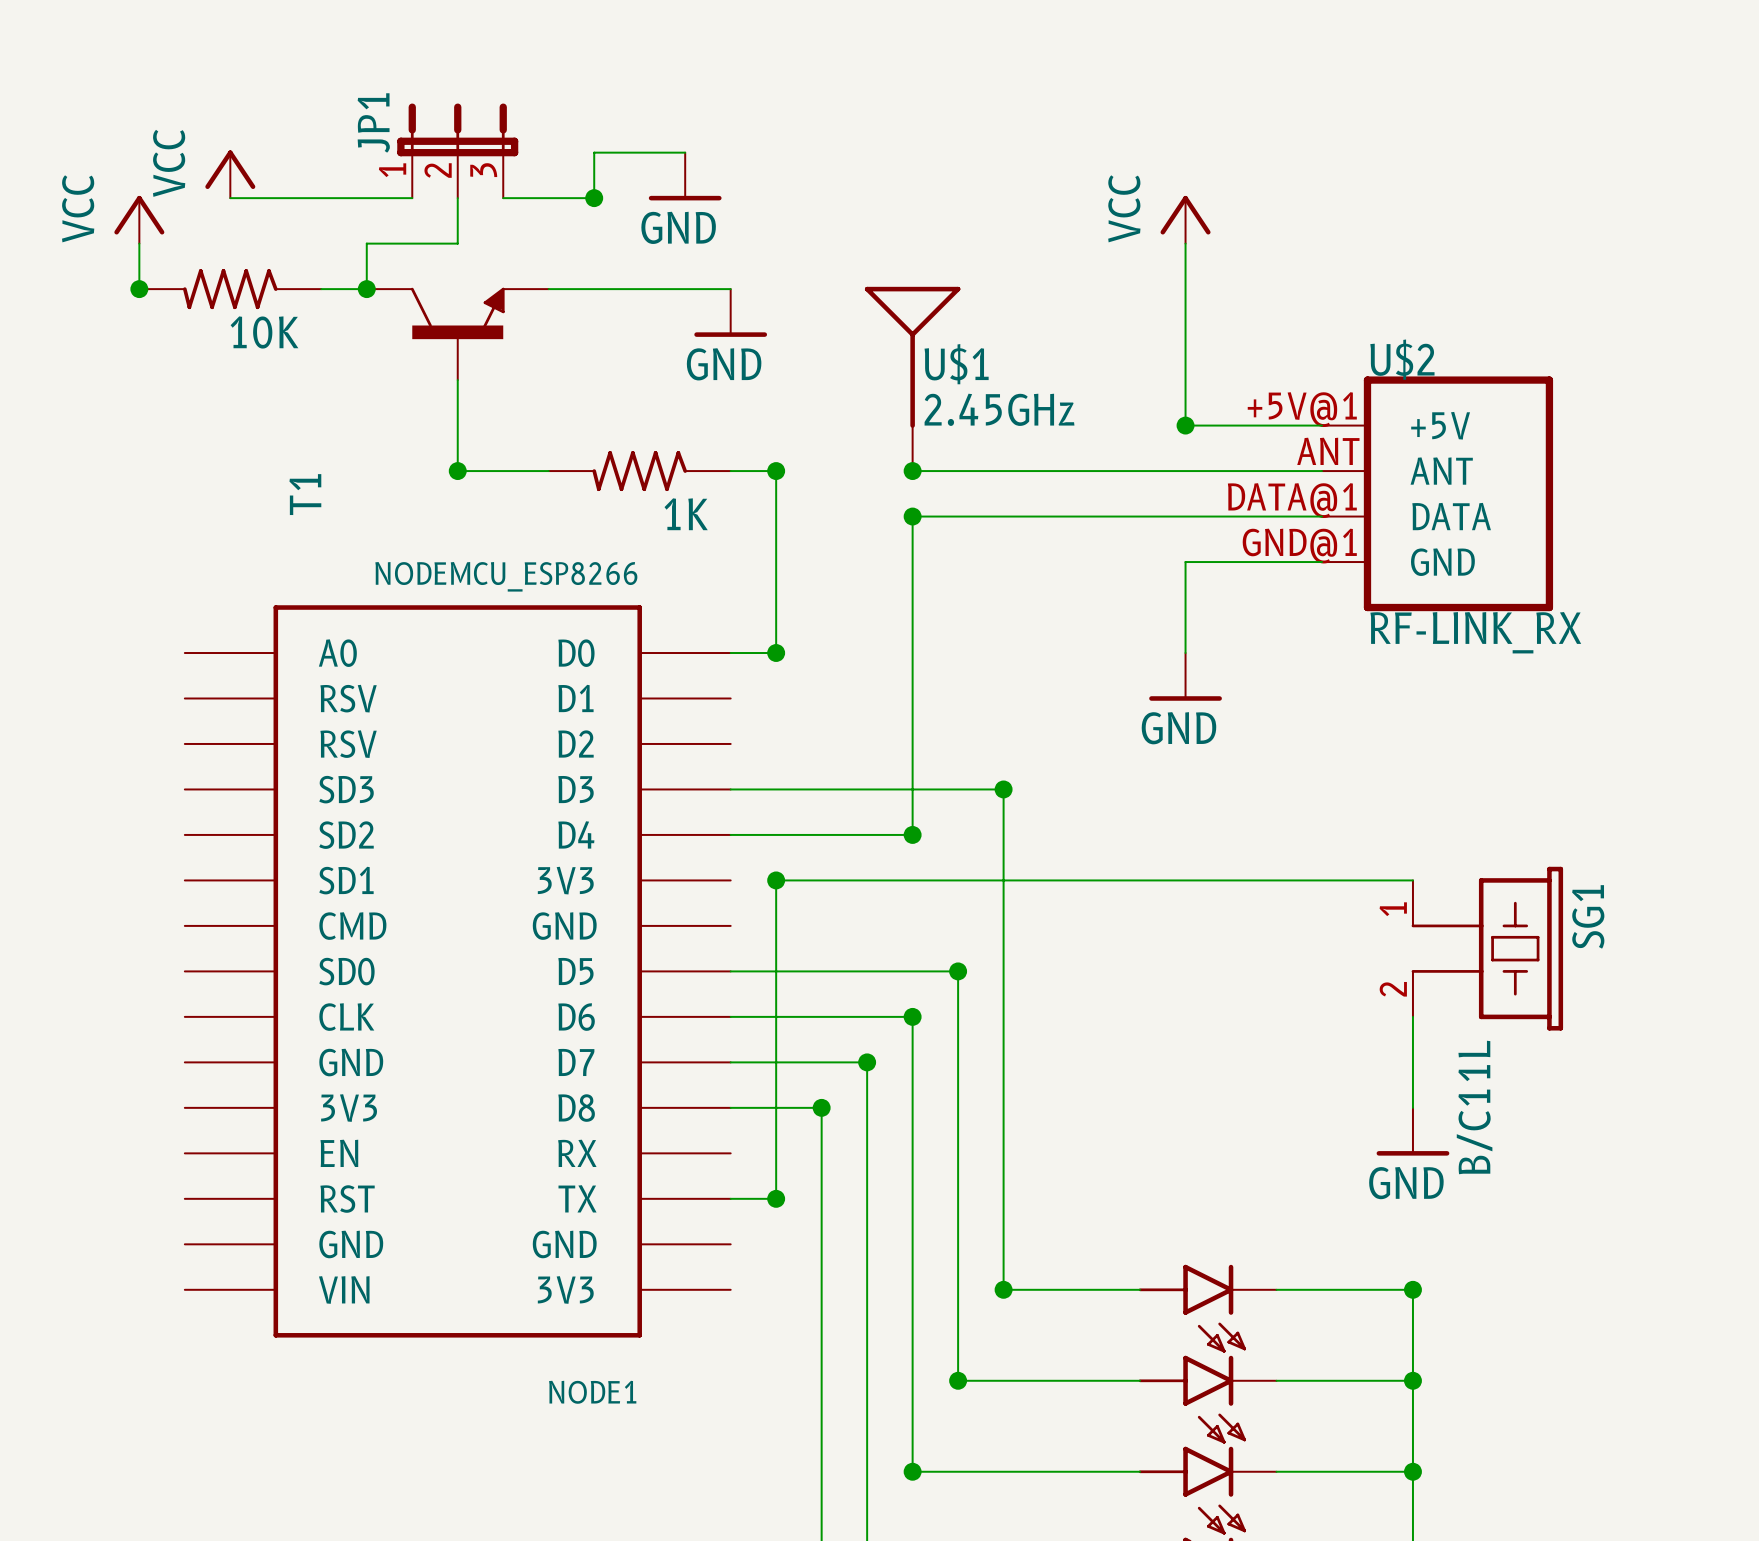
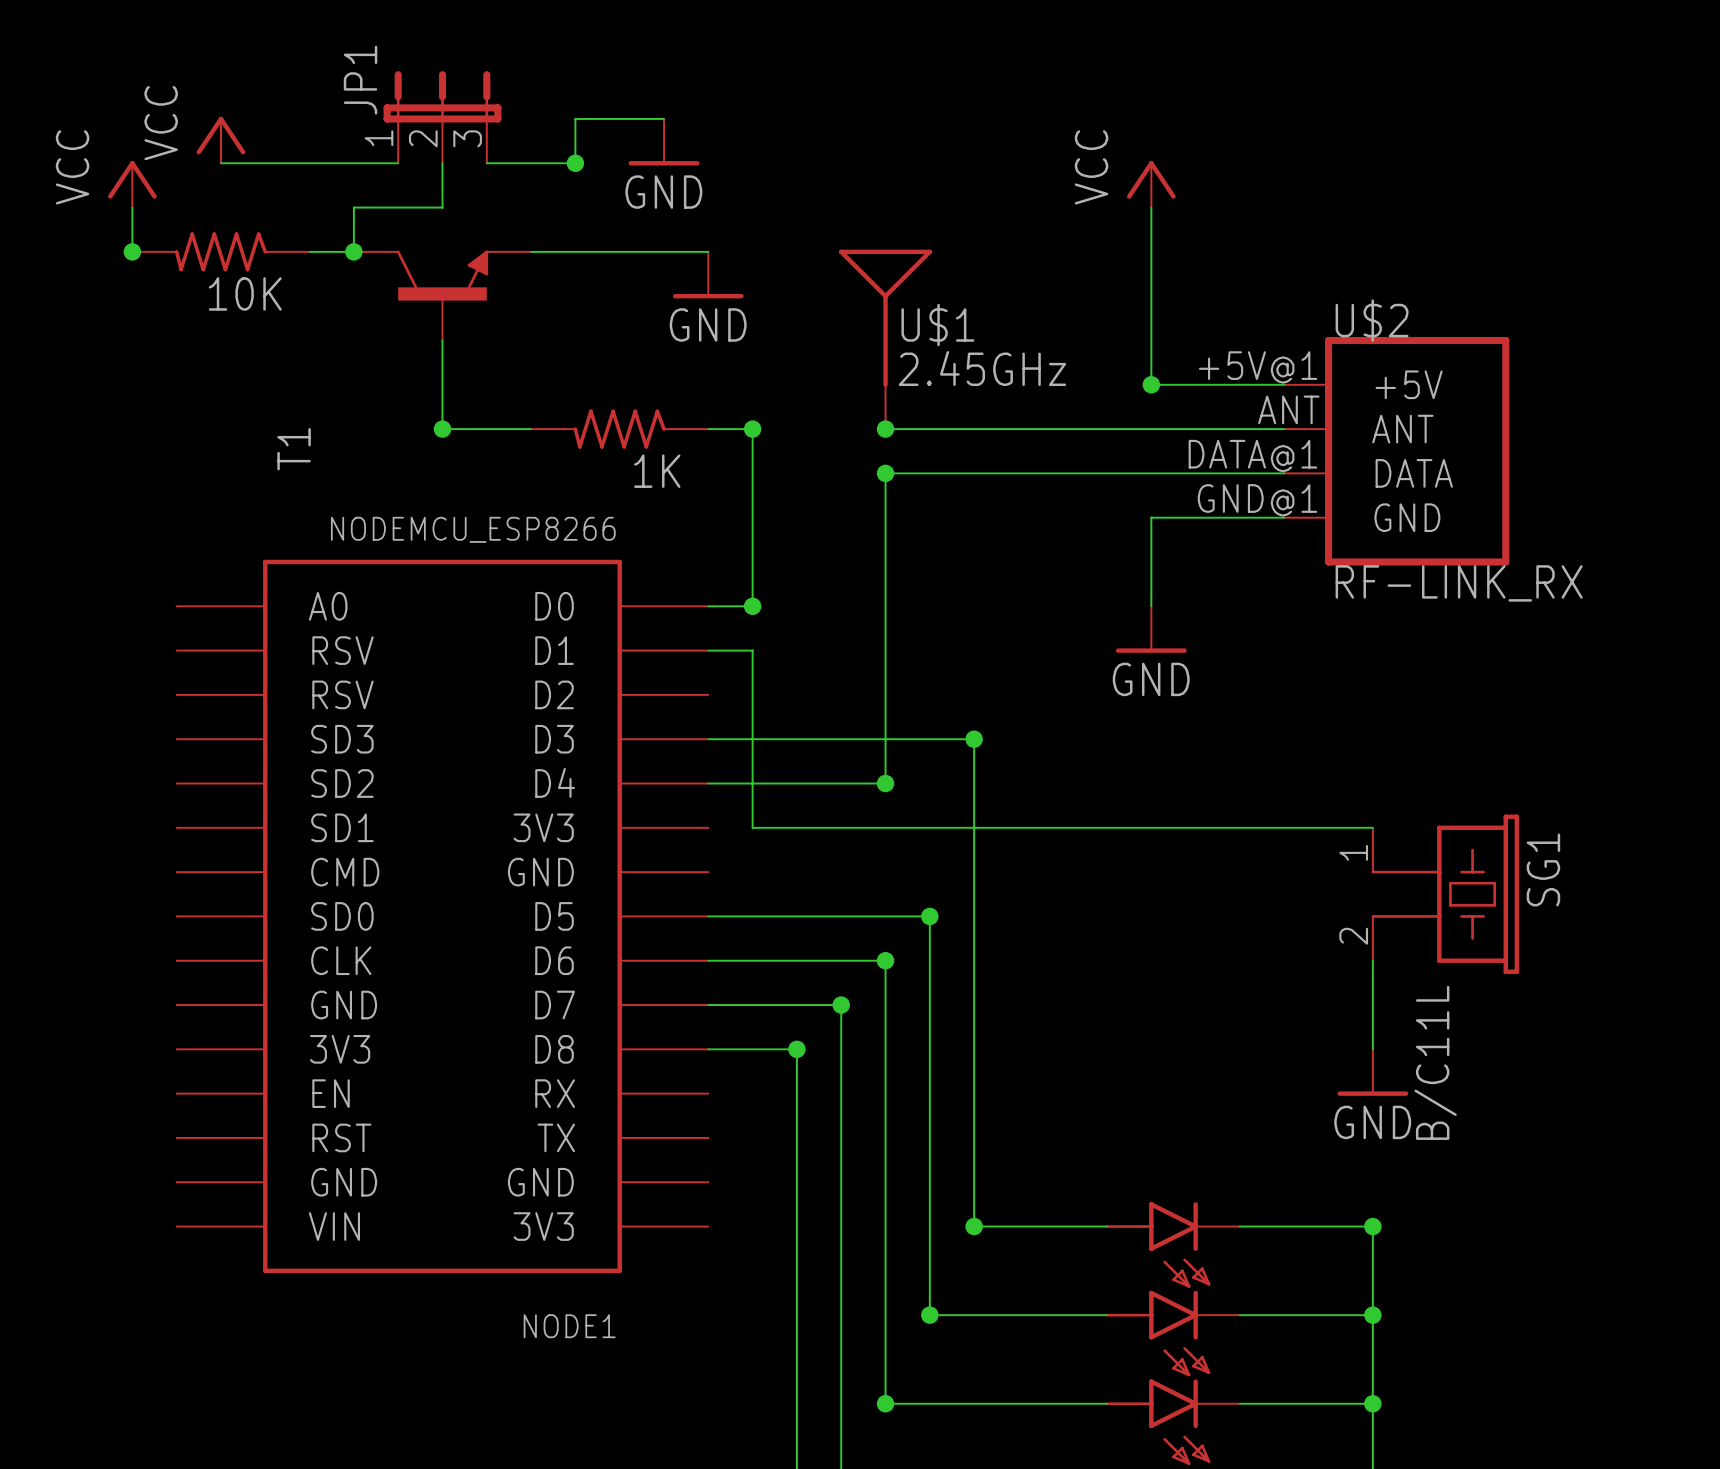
wire: (776, 880) (776, 1198) (730, 1198) -> (752, 827) (752, 650) (708, 650)
junction: (776, 880) -> none
junction: (776, 1198) -> none

